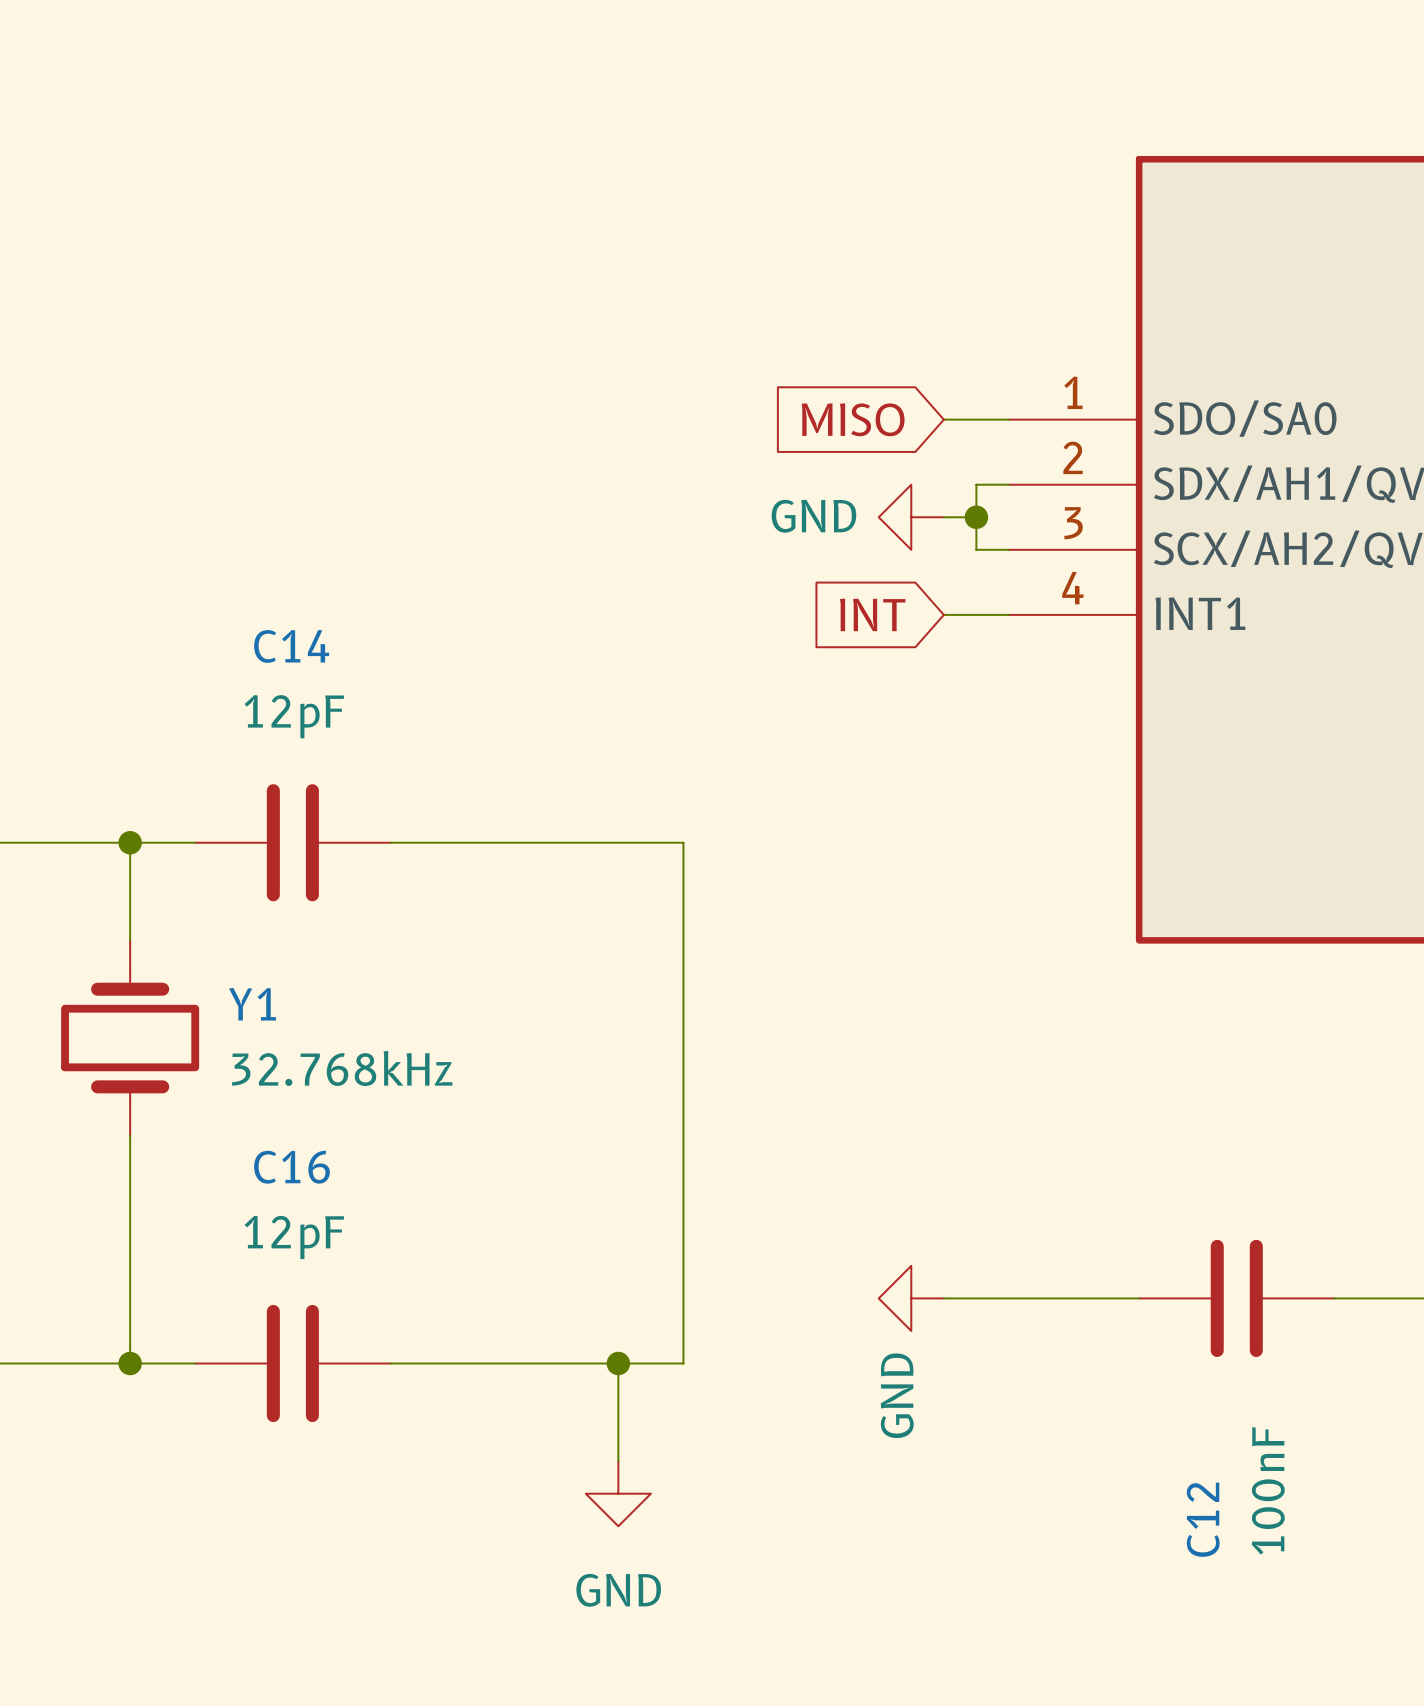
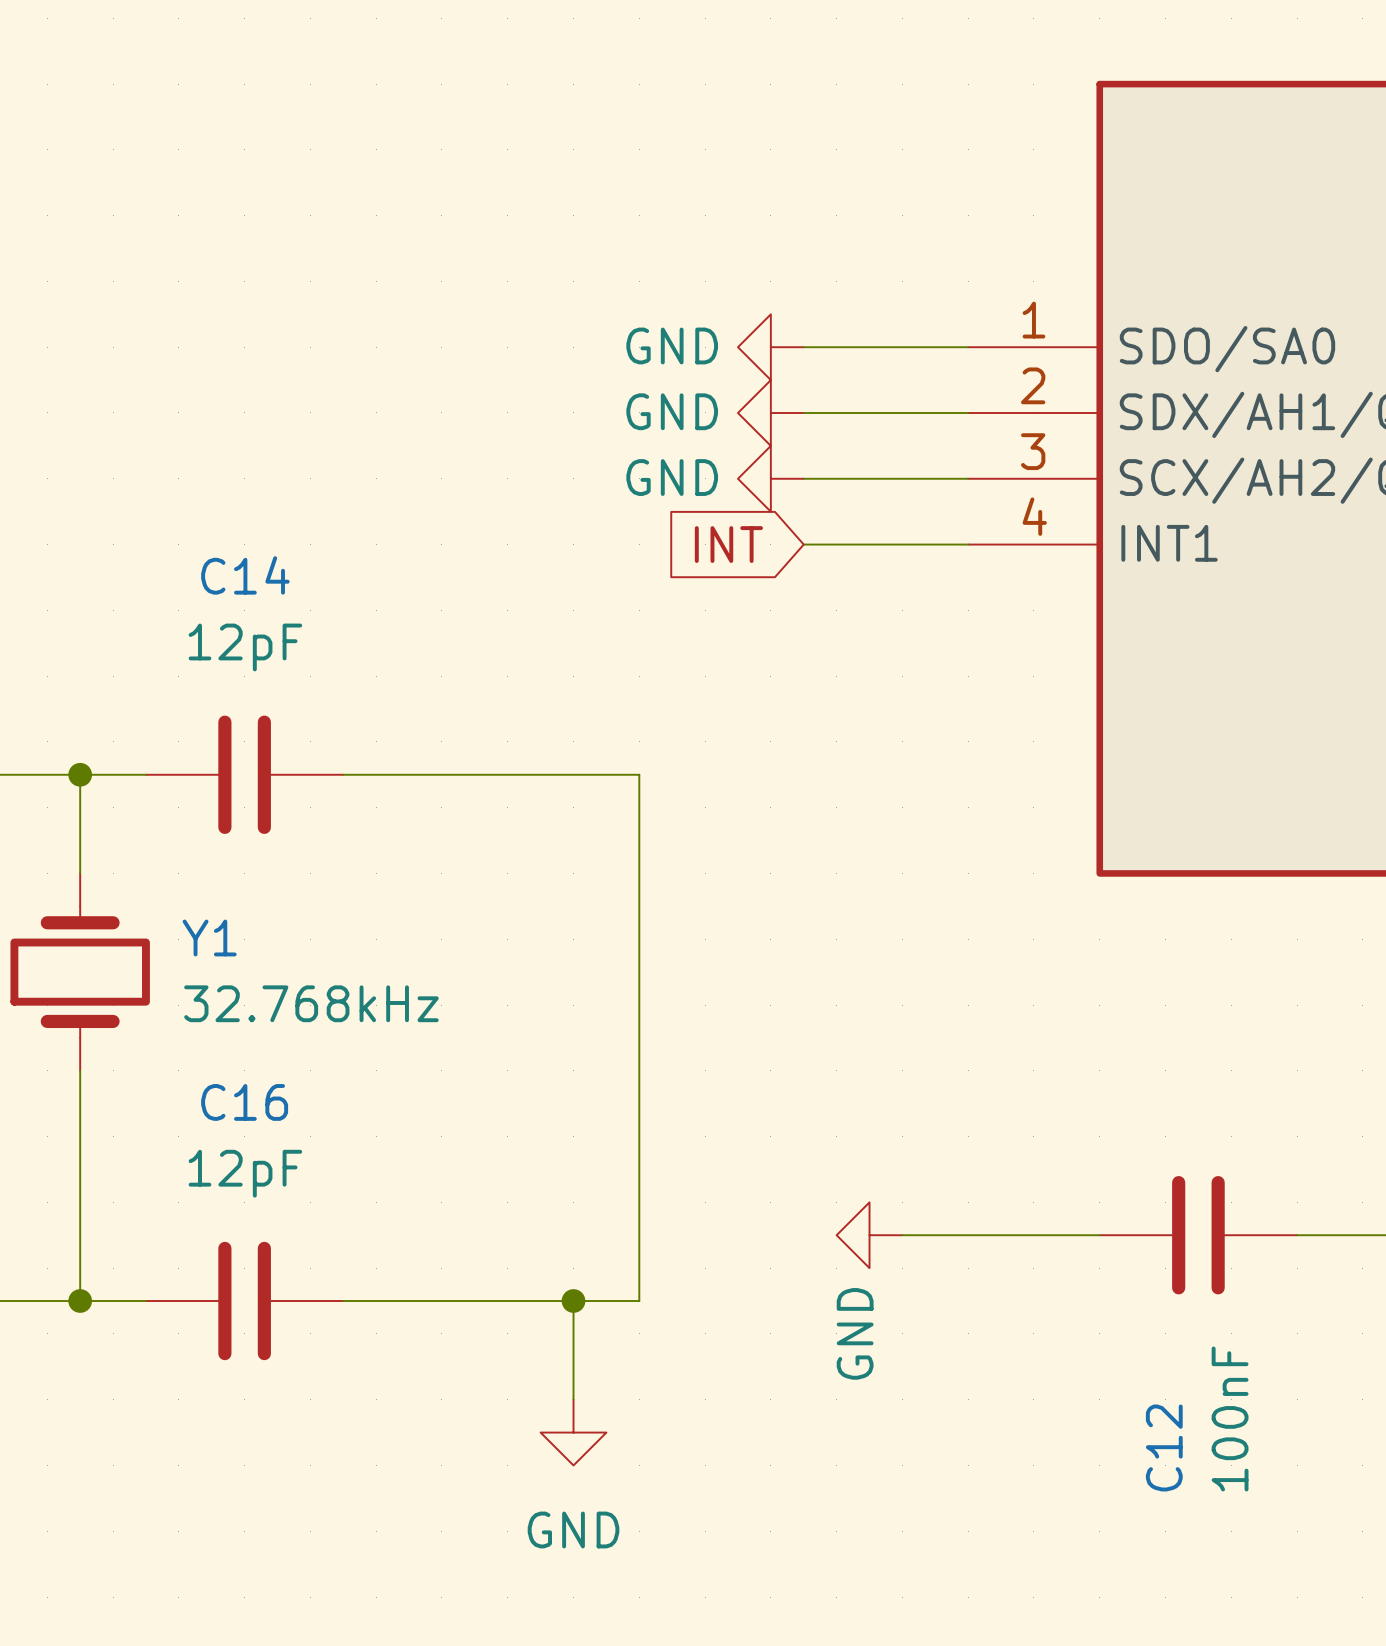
power symbol: none -> GND (770, 347)
wire: none -> (803, 347) (902, 347)
global label: MISO (853, 419) -> none
power symbol: none -> GND (770, 412)
wire: (976, 484) (976, 549) -> (935, 412) (803, 412)
power symbol: GND (911, 517) -> none
wire: (943, 517) (976, 517) -> none
junction: (976, 517) -> none
power symbol: none -> GND (770, 478)
wire: none -> (803, 478) (935, 478)
wire: none -> (803, 544) (902, 544)
global label position: INT (872, 614) -> INT (728, 544)

